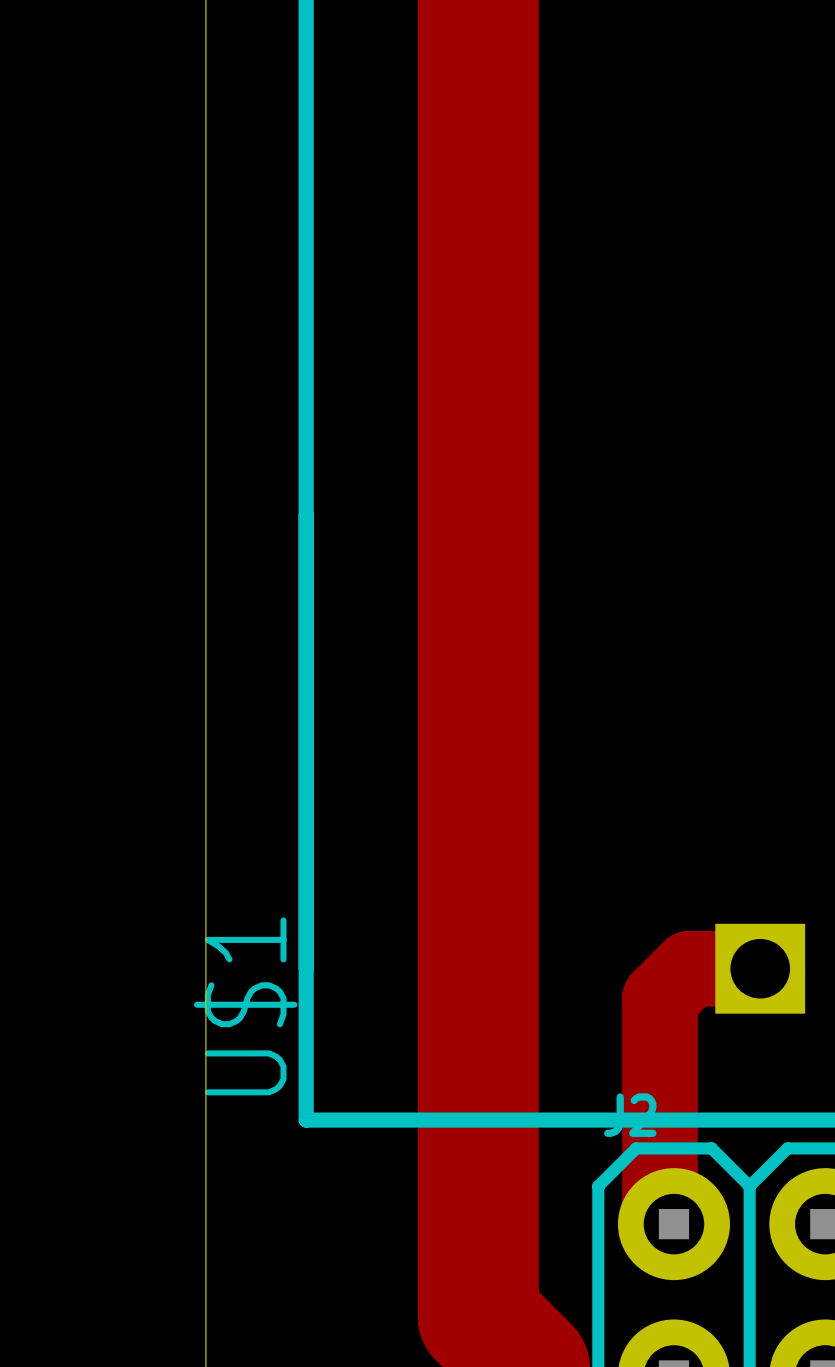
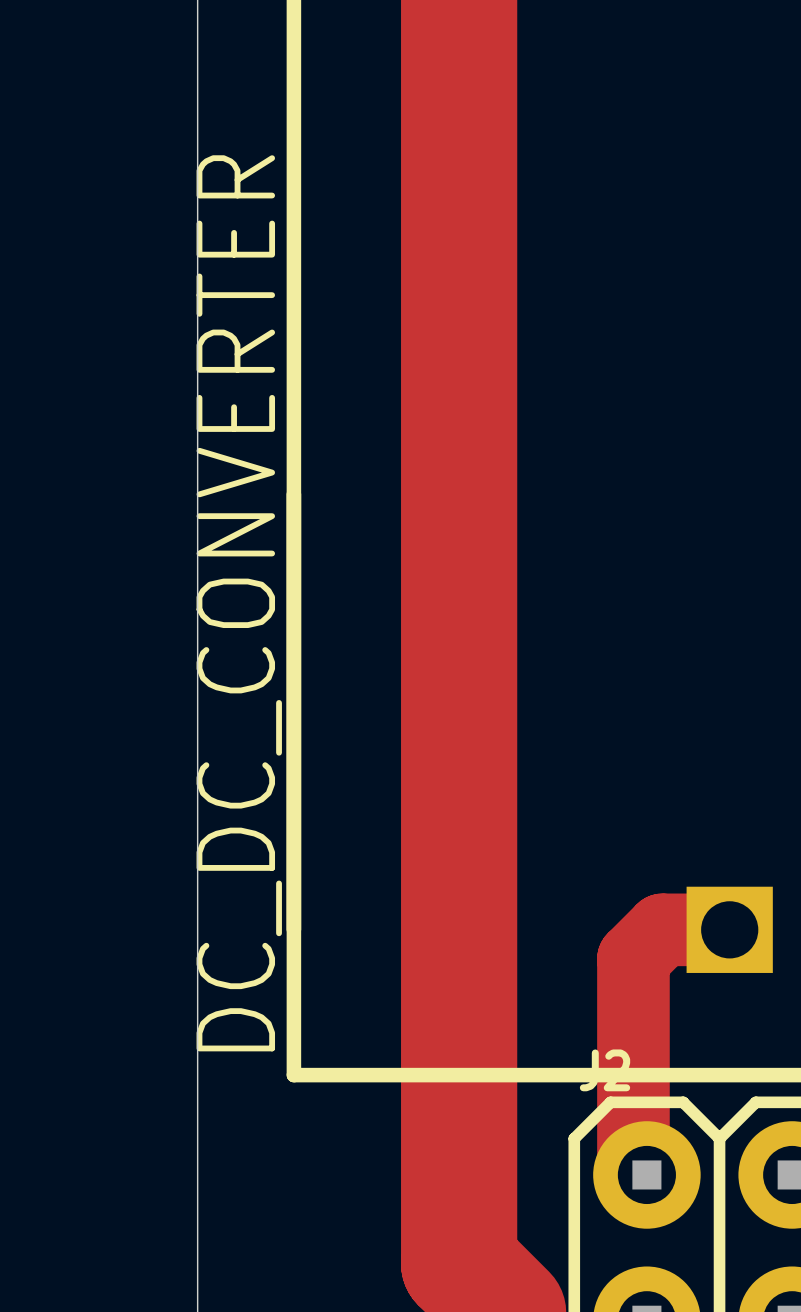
U$1 name: U$1 (245, 1006) -> DC_DC_CONVERTER (239, 603)

